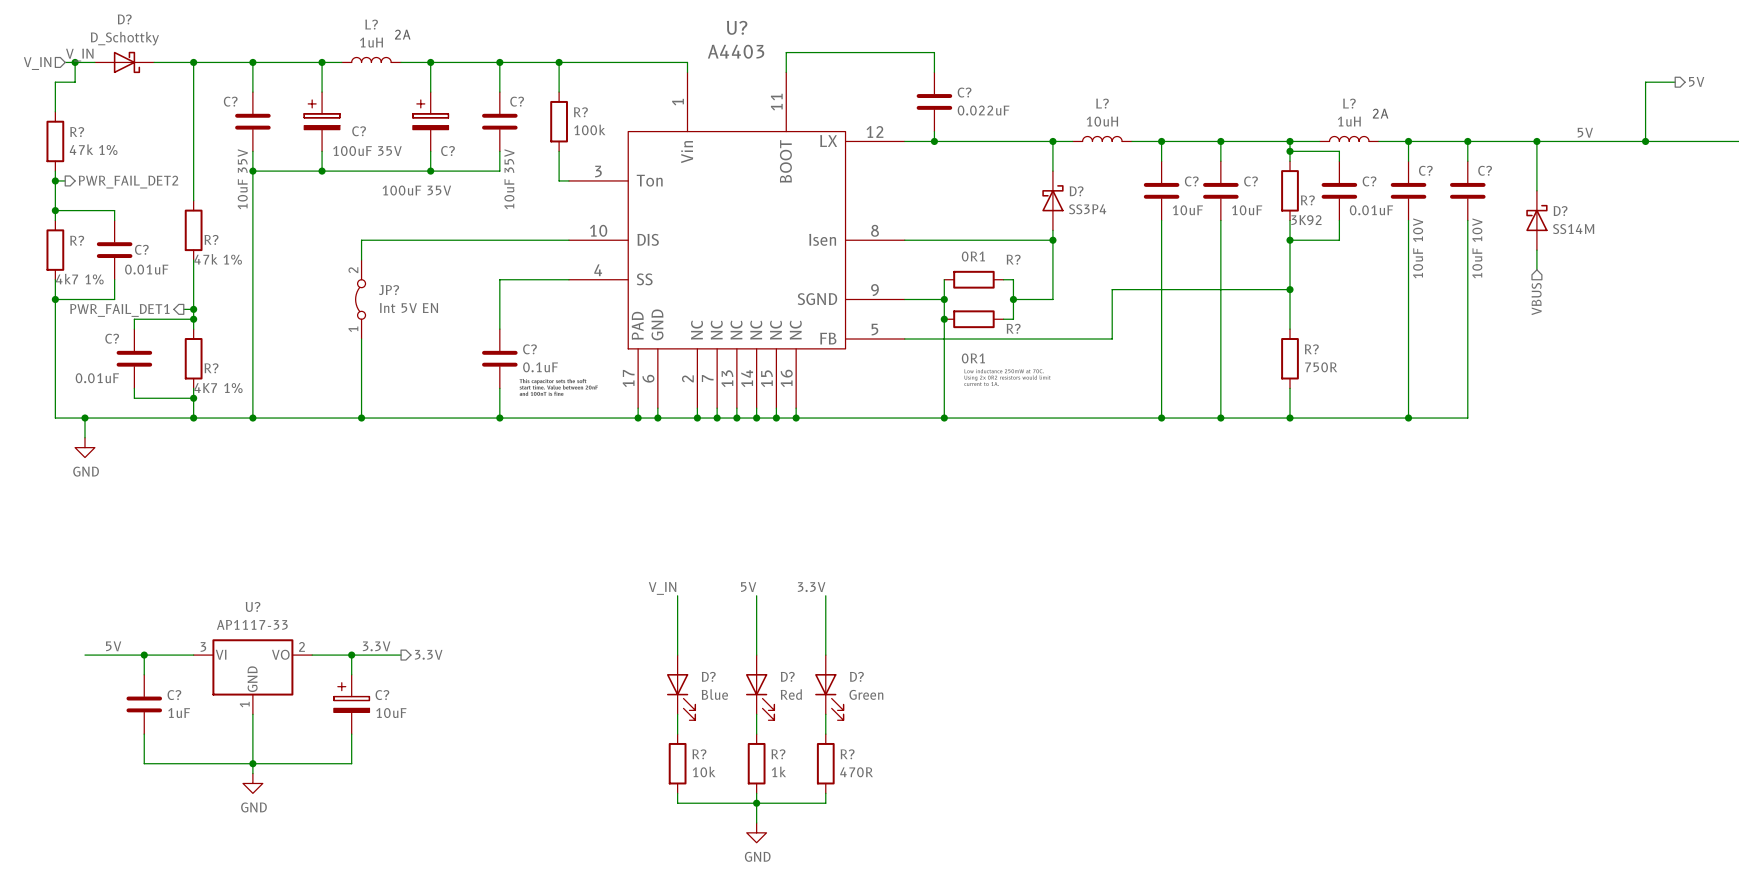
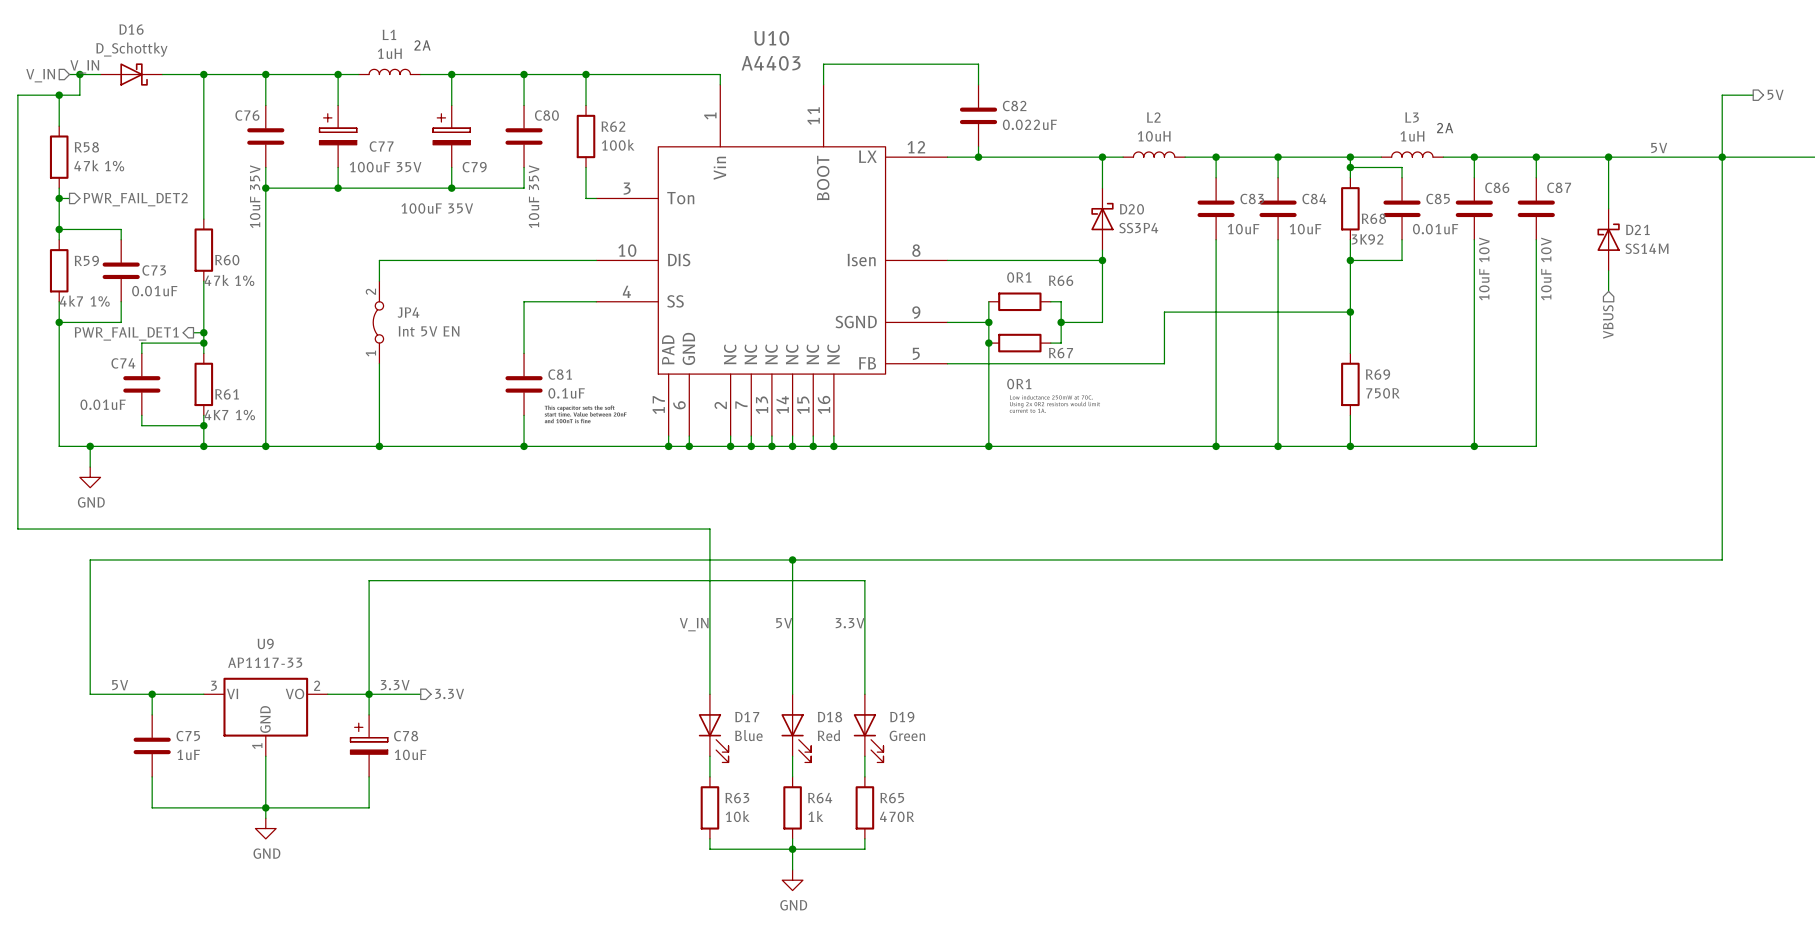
D? name: D? (124, 19) -> D16 (131, 29)
L? name: L? (371, 24) -> L1 (389, 34)
U? name: U? (737, 27) -> U10 (771, 38)
wire: none -> (59, 95) (17, 95) (17, 529) (709, 529) (709, 632)
junction: none -> (59, 95)
C? name: C? (964, 92) -> C82 (1014, 106)
C? name: C? (230, 101) -> C76 (247, 115)
C? name: C? (517, 101) -> C80 (546, 115)
L? name: L? (1102, 103) -> L2 (1153, 117)
L? name: L? (1349, 103) -> L3 (1412, 117)
R? name: R? (580, 112) -> R62 (613, 126)
C? name: C? (359, 131) -> C77 (381, 146)
R? name: R? (77, 132) -> R58 (86, 147)
wire: none -> (1722, 157) (1722, 559) (90, 559) (90, 694)
C? name: C? (448, 151) -> C79 (474, 167)
C? name: C? (1425, 170) -> C86 (1497, 187)
C? name: C? (1485, 170) -> C87 (1559, 187)
C? name: C? (1191, 181) -> C83 (1252, 198)
C? name: C? (1251, 181) -> C84 (1314, 198)
C? name: C? (1369, 181) -> C85 (1438, 198)
D? name: D? (1076, 191) -> D20 (1131, 209)
R? name: R? (1307, 200) -> R68 (1373, 218)
D? name: D? (1560, 211) -> D21 (1637, 229)
R? name: R? (211, 239) -> R60 (227, 260)
R? name: R? (77, 240) -> R59 (86, 260)
C? name: C? (141, 249) -> C73 (154, 270)
R? name: R? (1013, 259) -> R66 (1061, 280)
JP? name: JP? (389, 290) -> JP4 (408, 312)
R? name: R? (1013, 328) -> R67 (1061, 353)
C? name: C? (112, 338) -> C74 (123, 363)
C? name: C? (529, 349) -> C81 (560, 374)
R? name: R? (1311, 349) -> R69 (1378, 374)
R? name: R? (211, 368) -> R61 (227, 394)
wire: none -> (792, 559) (792, 632)
junction: none -> (792, 559)
wire: none -> (864, 632) (864, 580) (369, 580) (369, 694)
U? name: U? (253, 606) -> U9 (265, 643)
D? name: D? (708, 676) -> D17 (747, 717)
D? name: D? (787, 676) -> D18 (830, 717)
D? name: D? (856, 676) -> D19 (902, 717)
C? name: C? (174, 695) -> C75 (188, 736)
C? name: C? (382, 695) -> C78 (406, 736)
R? name: R? (699, 754) -> R63 (737, 798)
R? name: R? (778, 754) -> R64 (820, 798)
R? name: R? (847, 754) -> R65 (892, 798)

